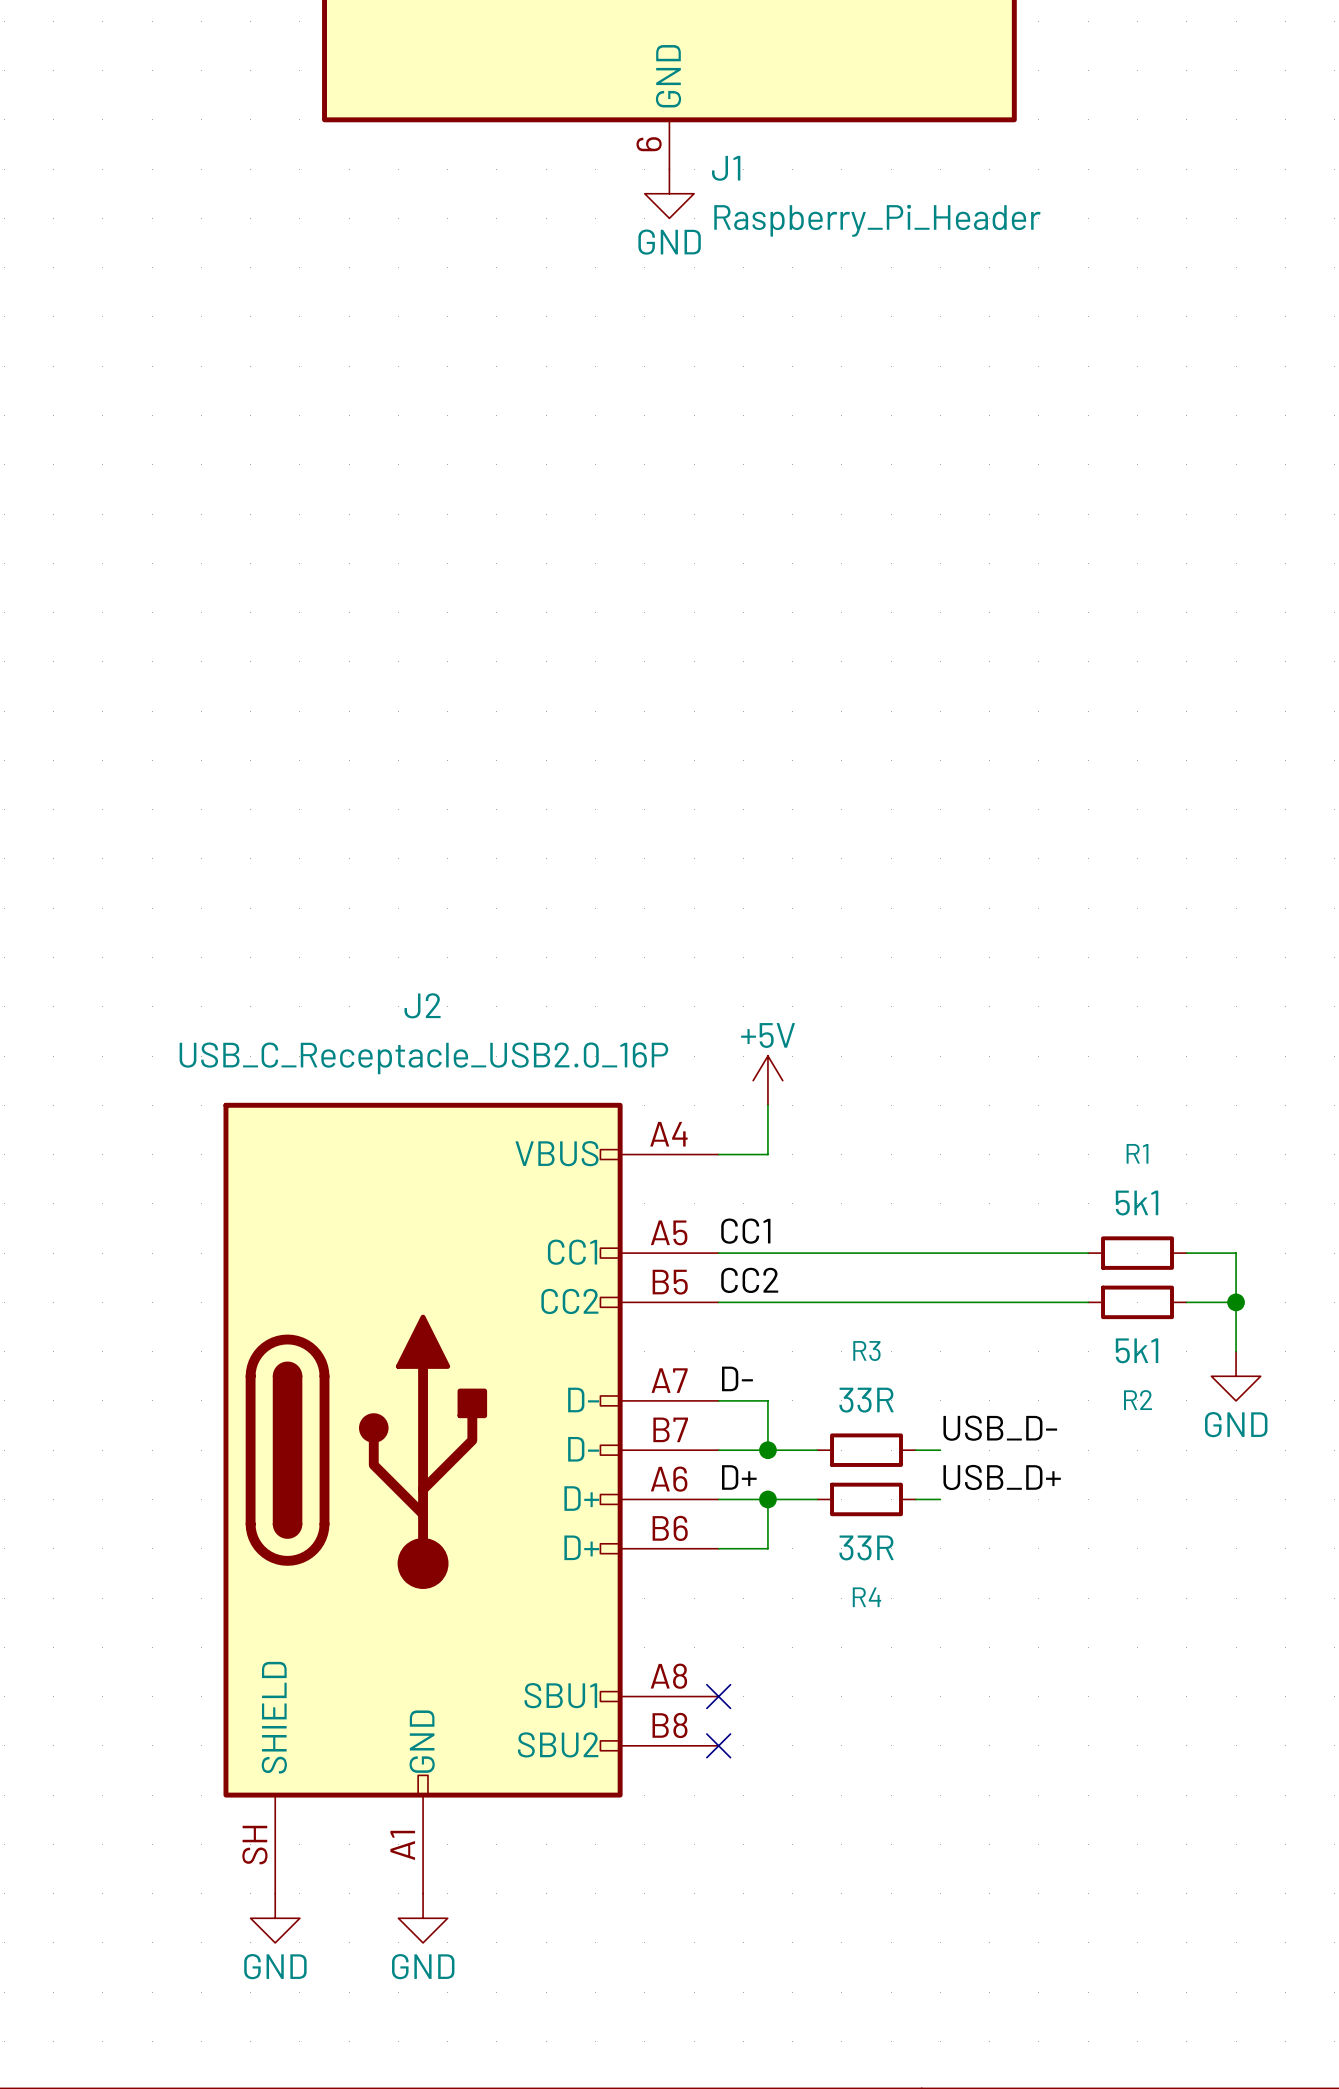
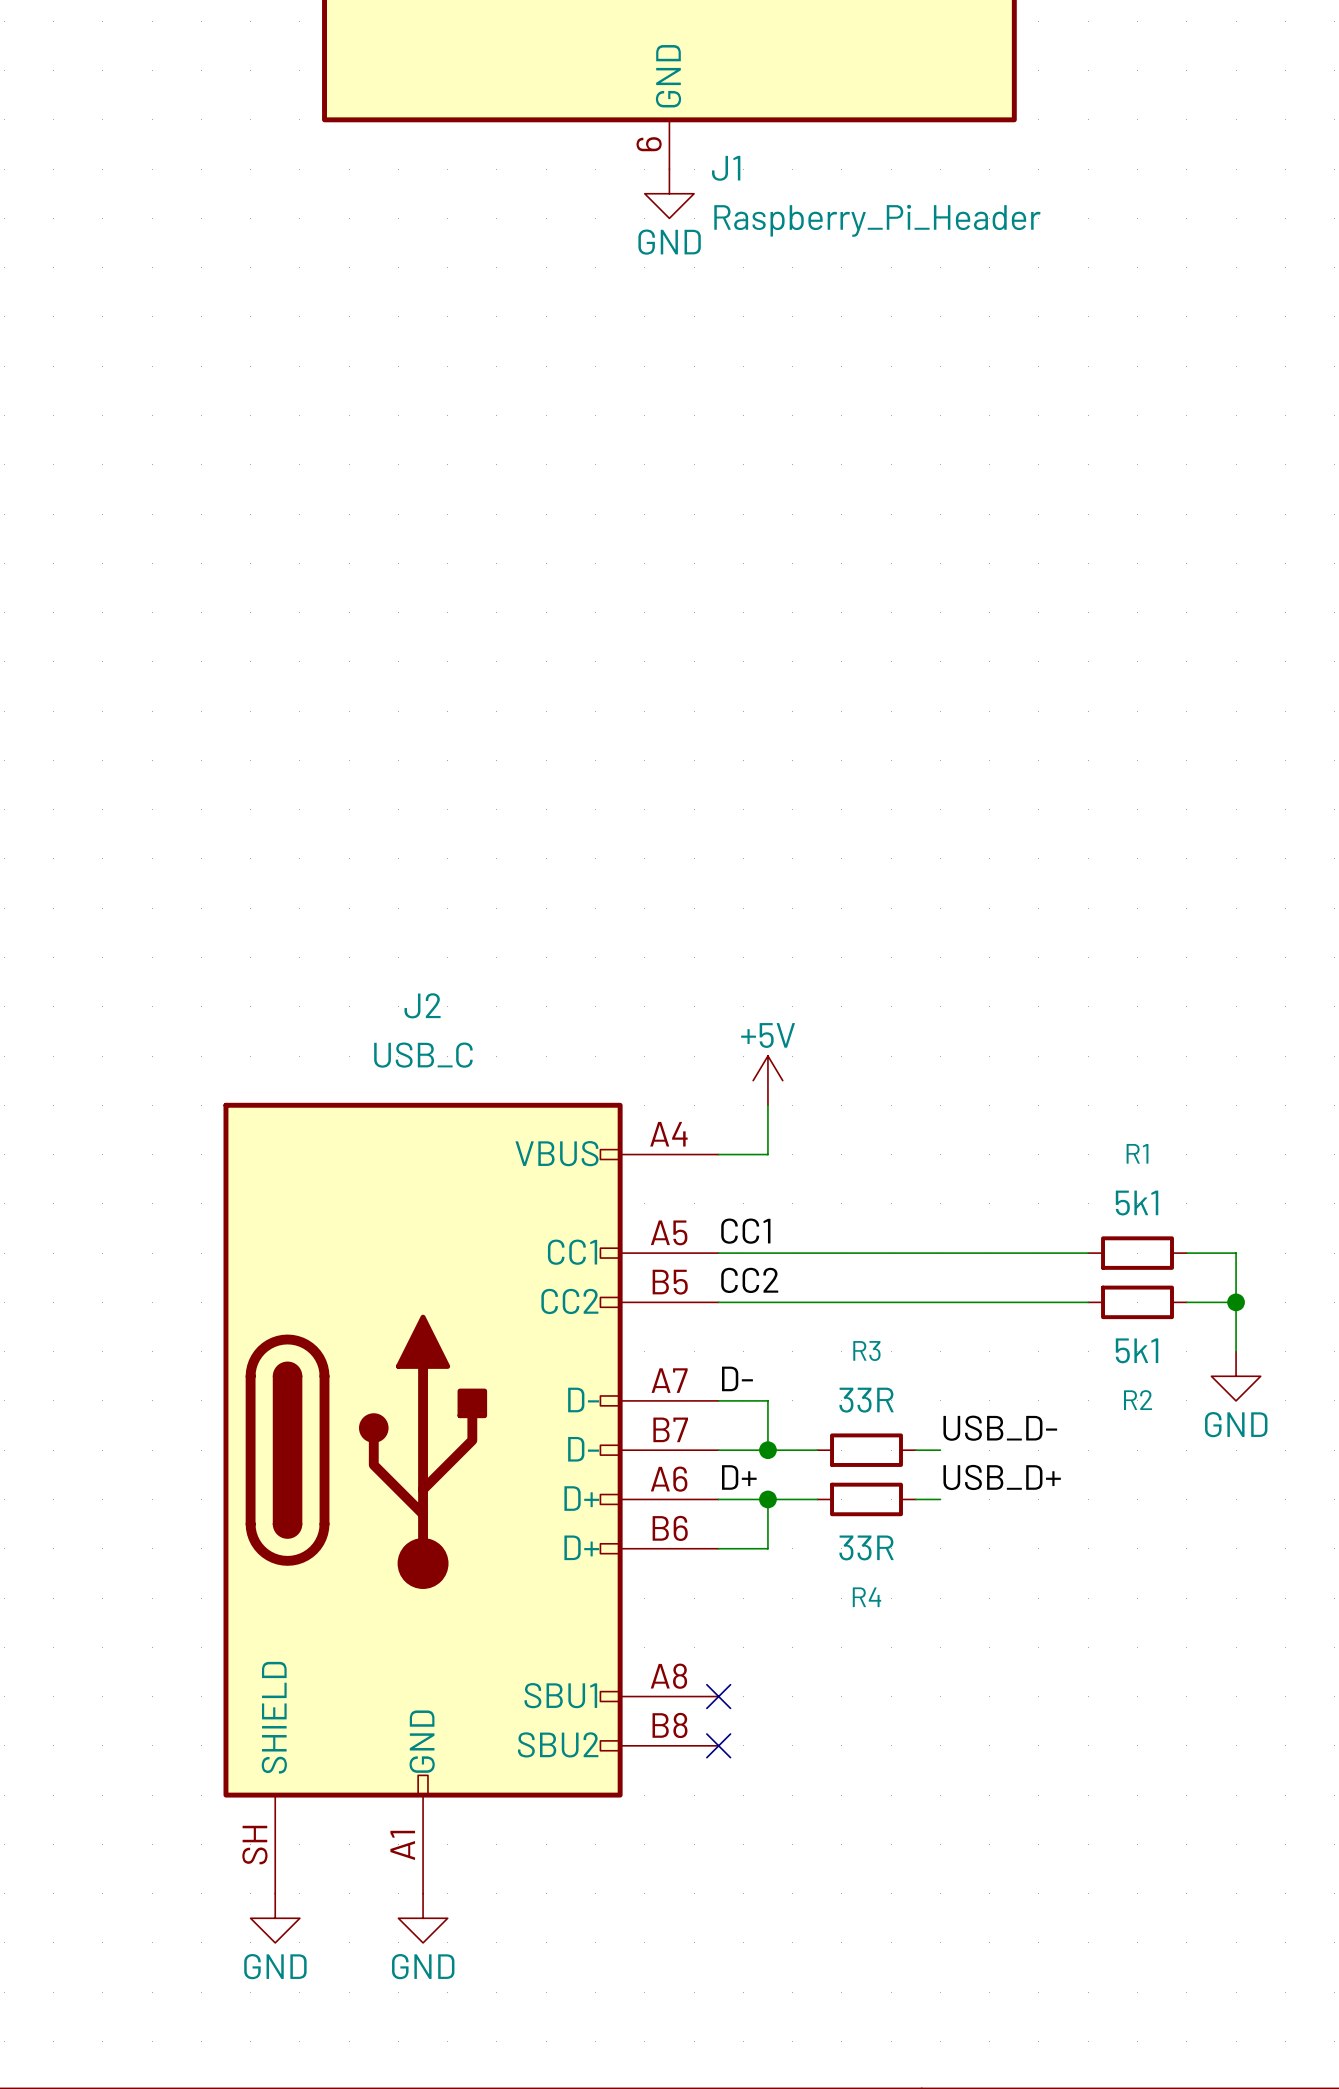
J2 value: USB_C_Receptacle_USB2.0_16P (423, 1058) -> USB_C (423, 1055)

